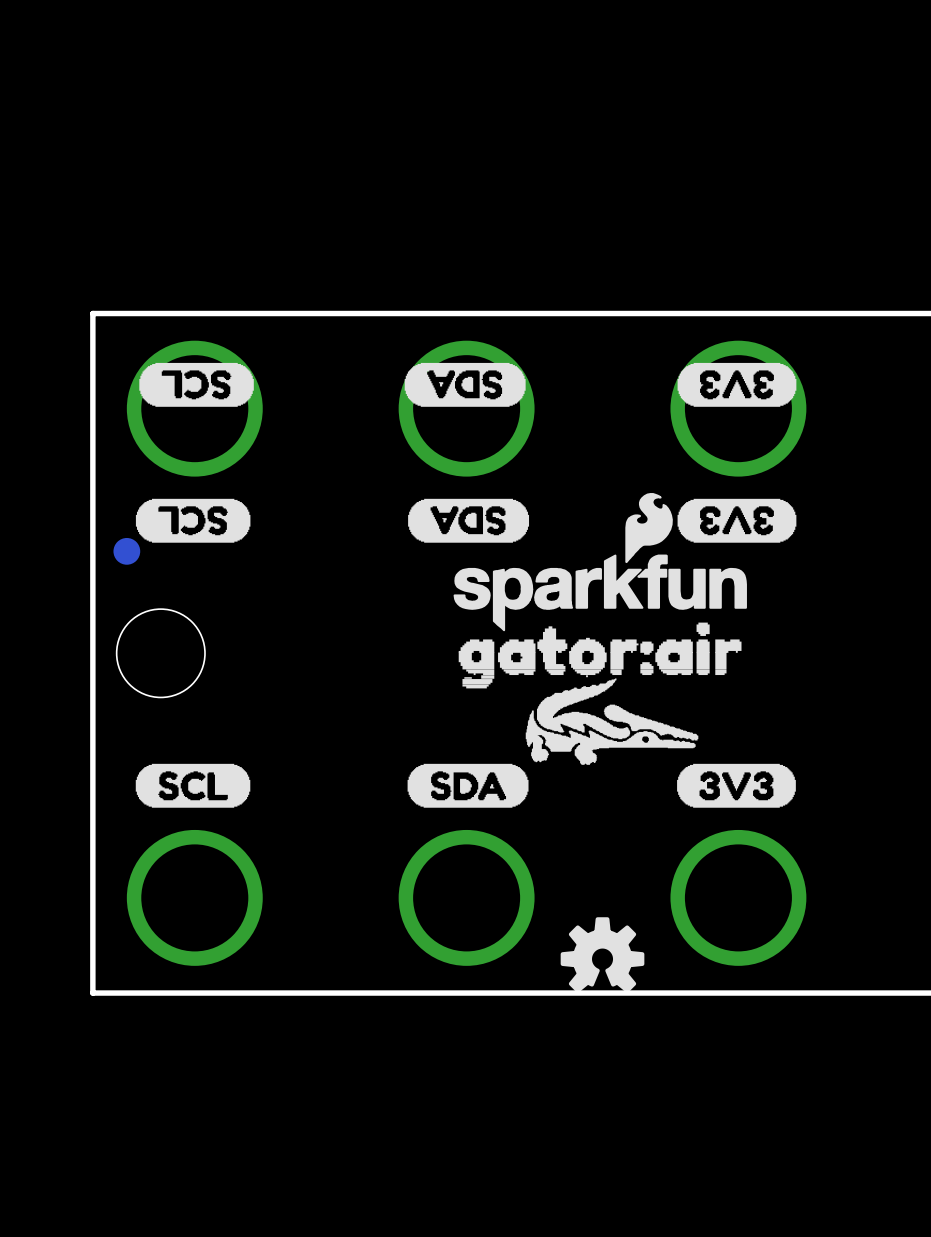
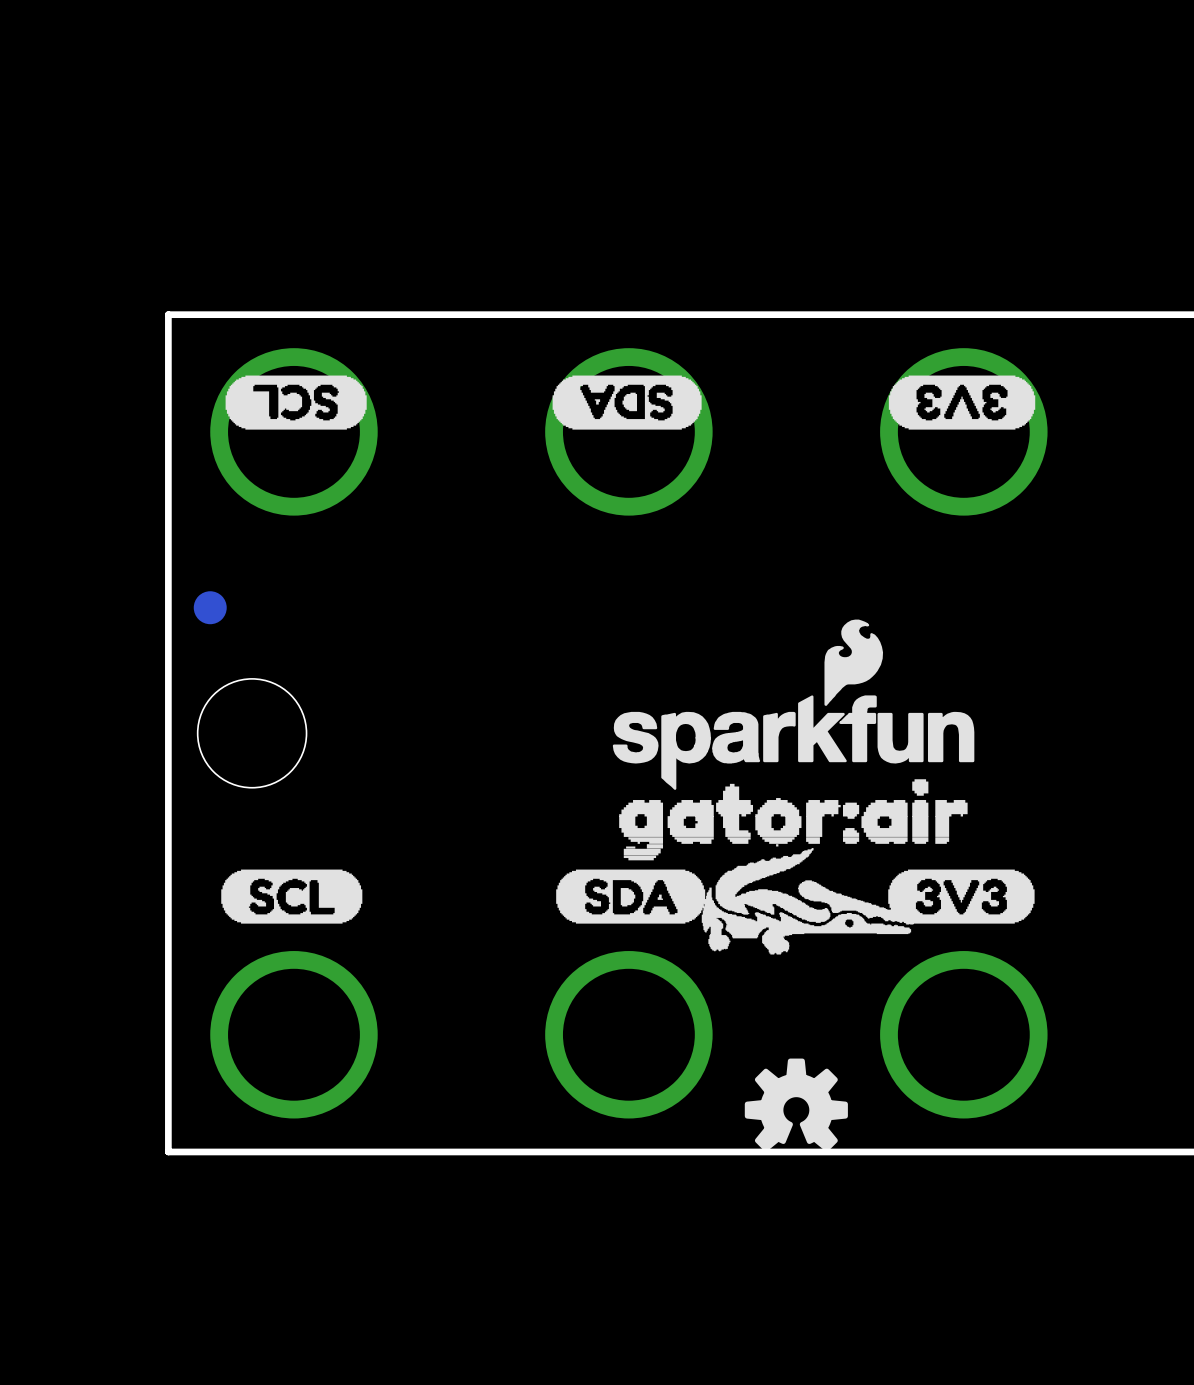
drawing: [135, 498, 251, 543] -> none
drawing: [408, 498, 530, 543] -> none
drawing: [677, 498, 797, 543] -> none
drawing position: (600, 562) -> (793, 704)
drawing position: (600, 655) -> (793, 819)
drawing position: (612, 721) -> (808, 901)

